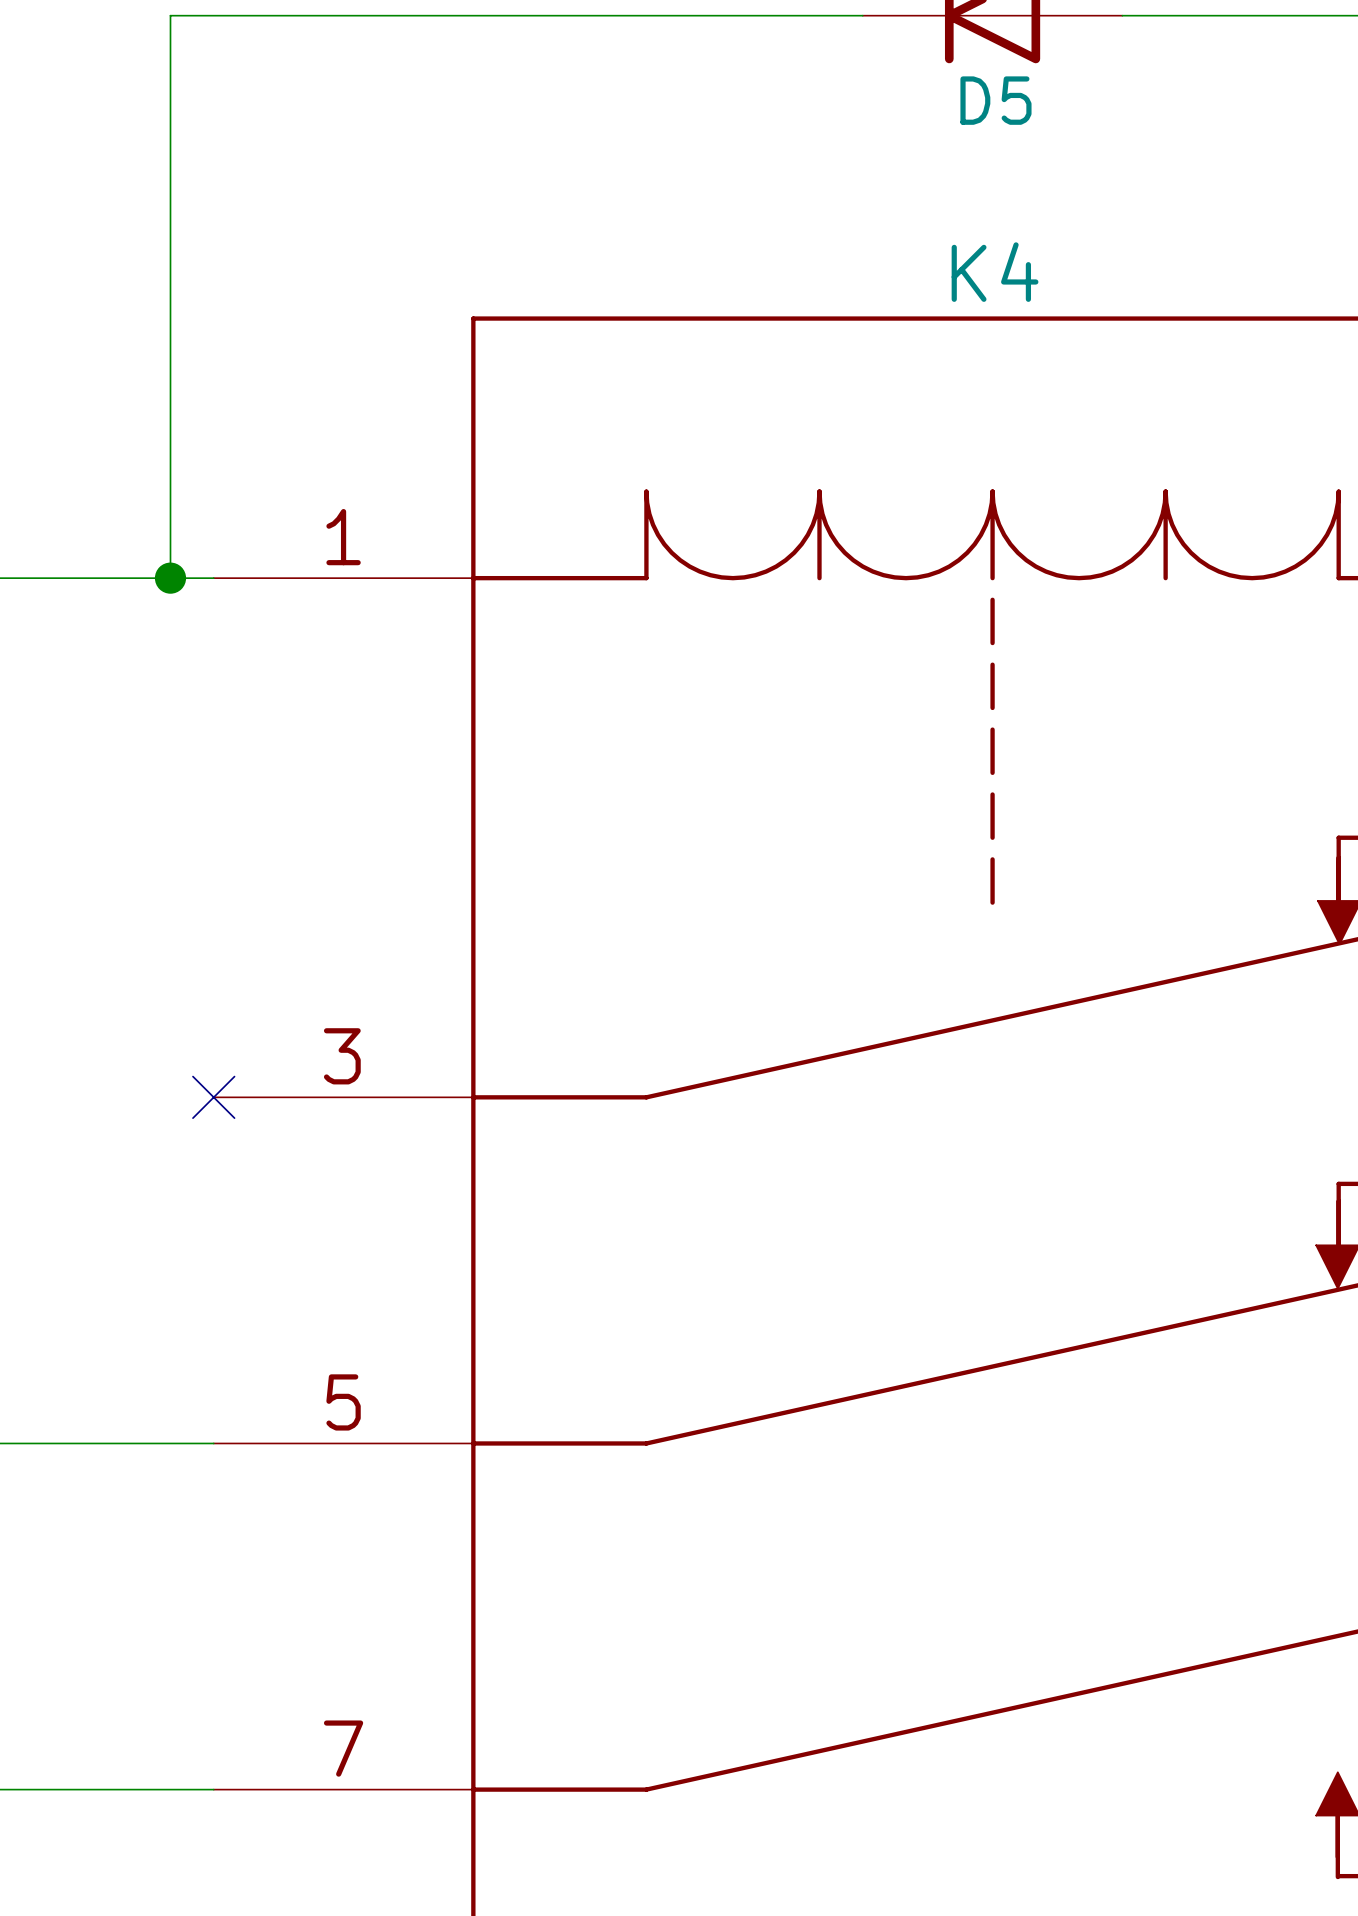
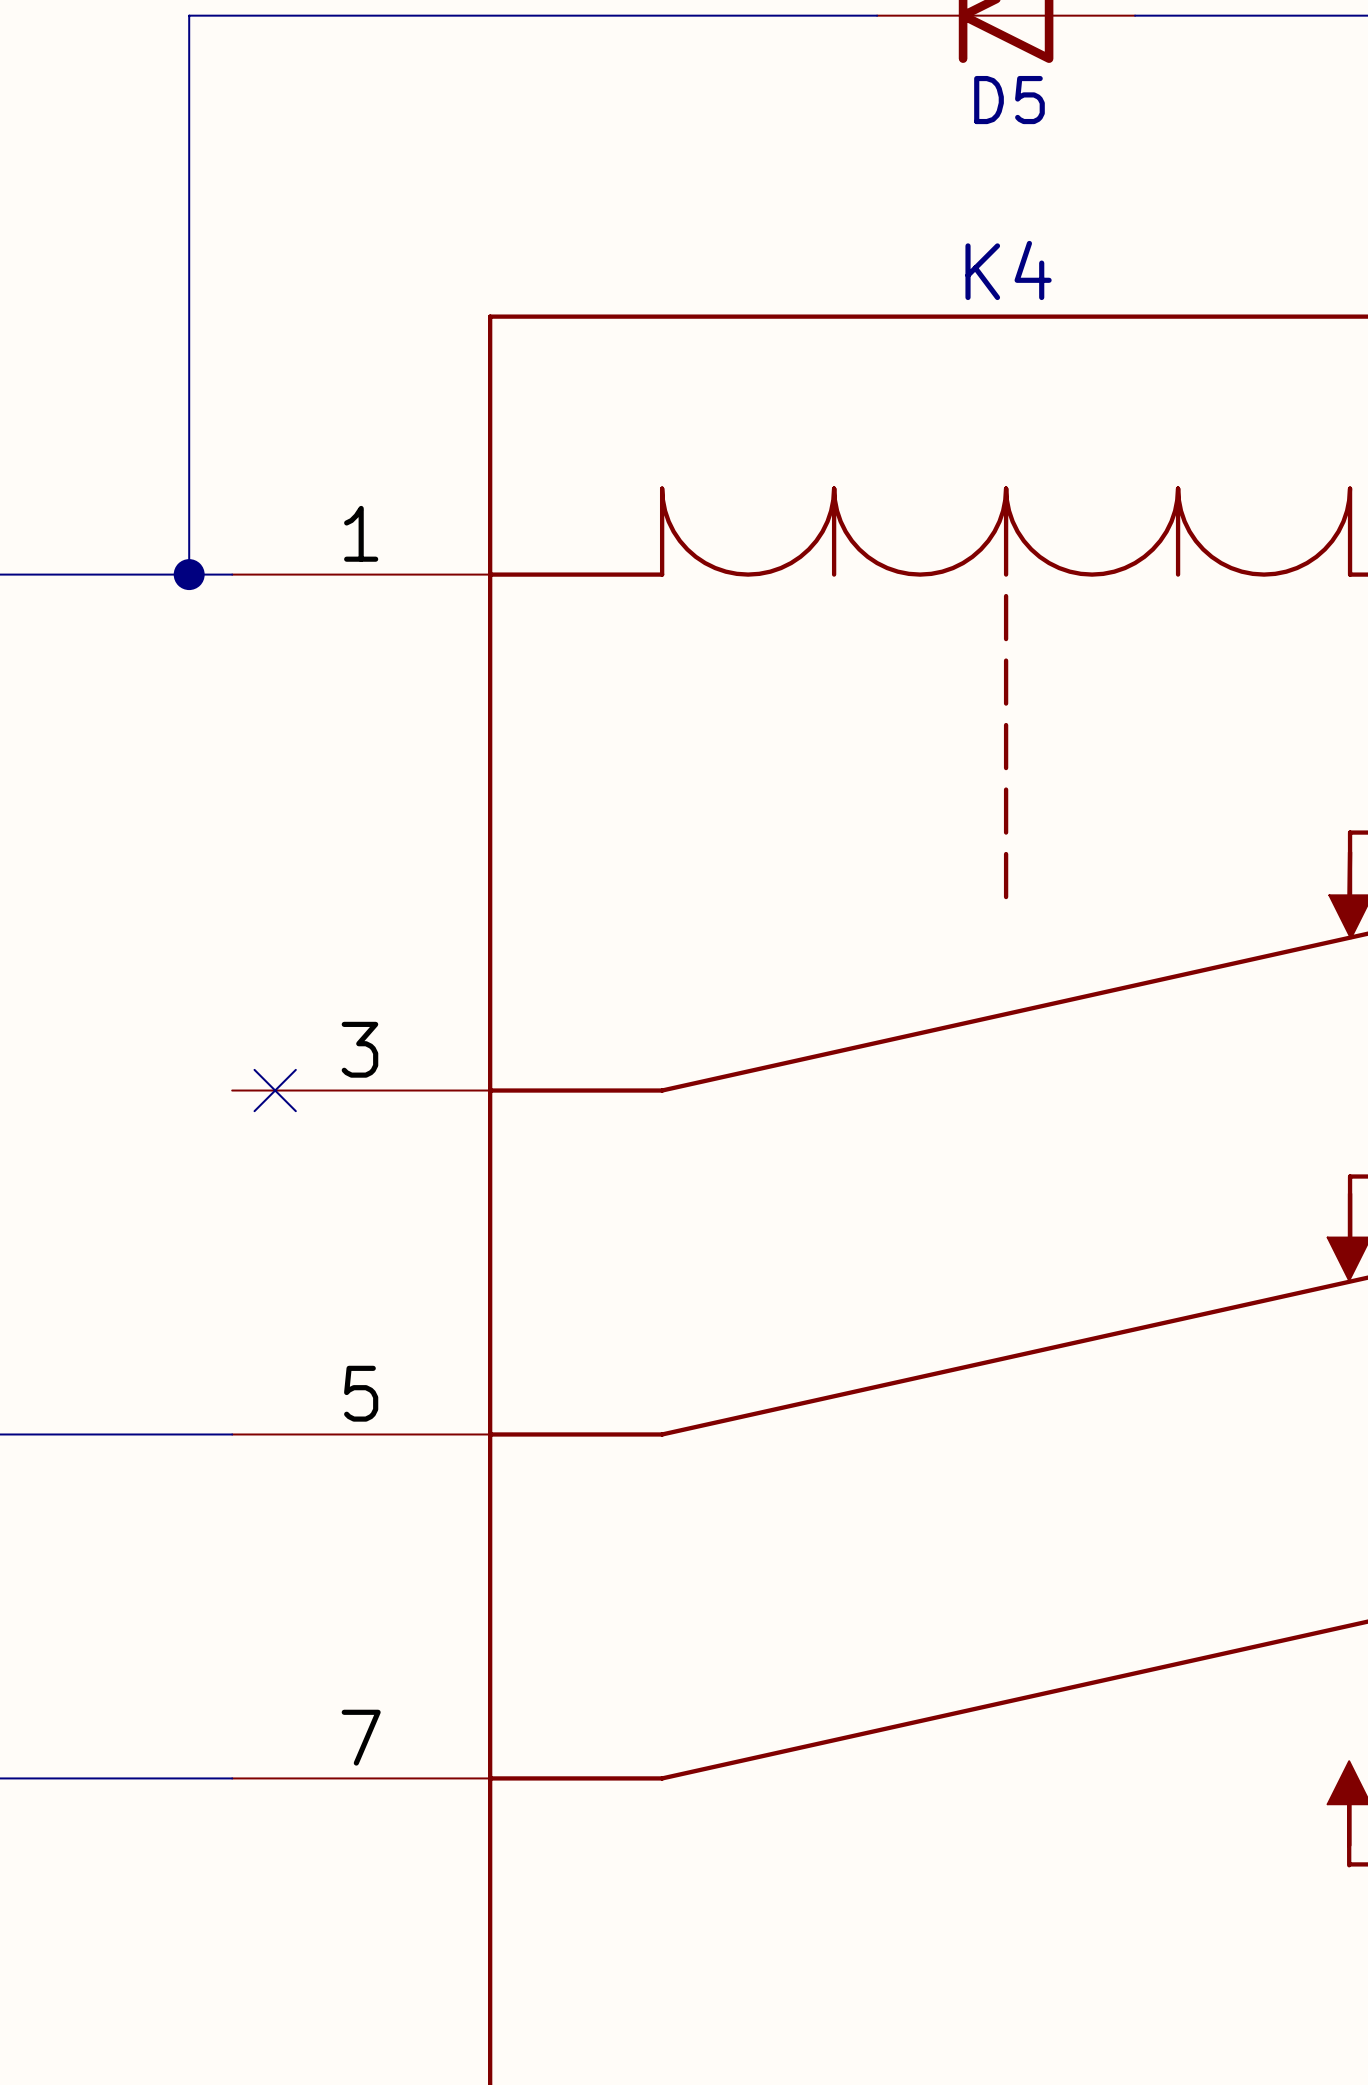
no-connect mark position: (213, 1097) -> (275, 1090)

